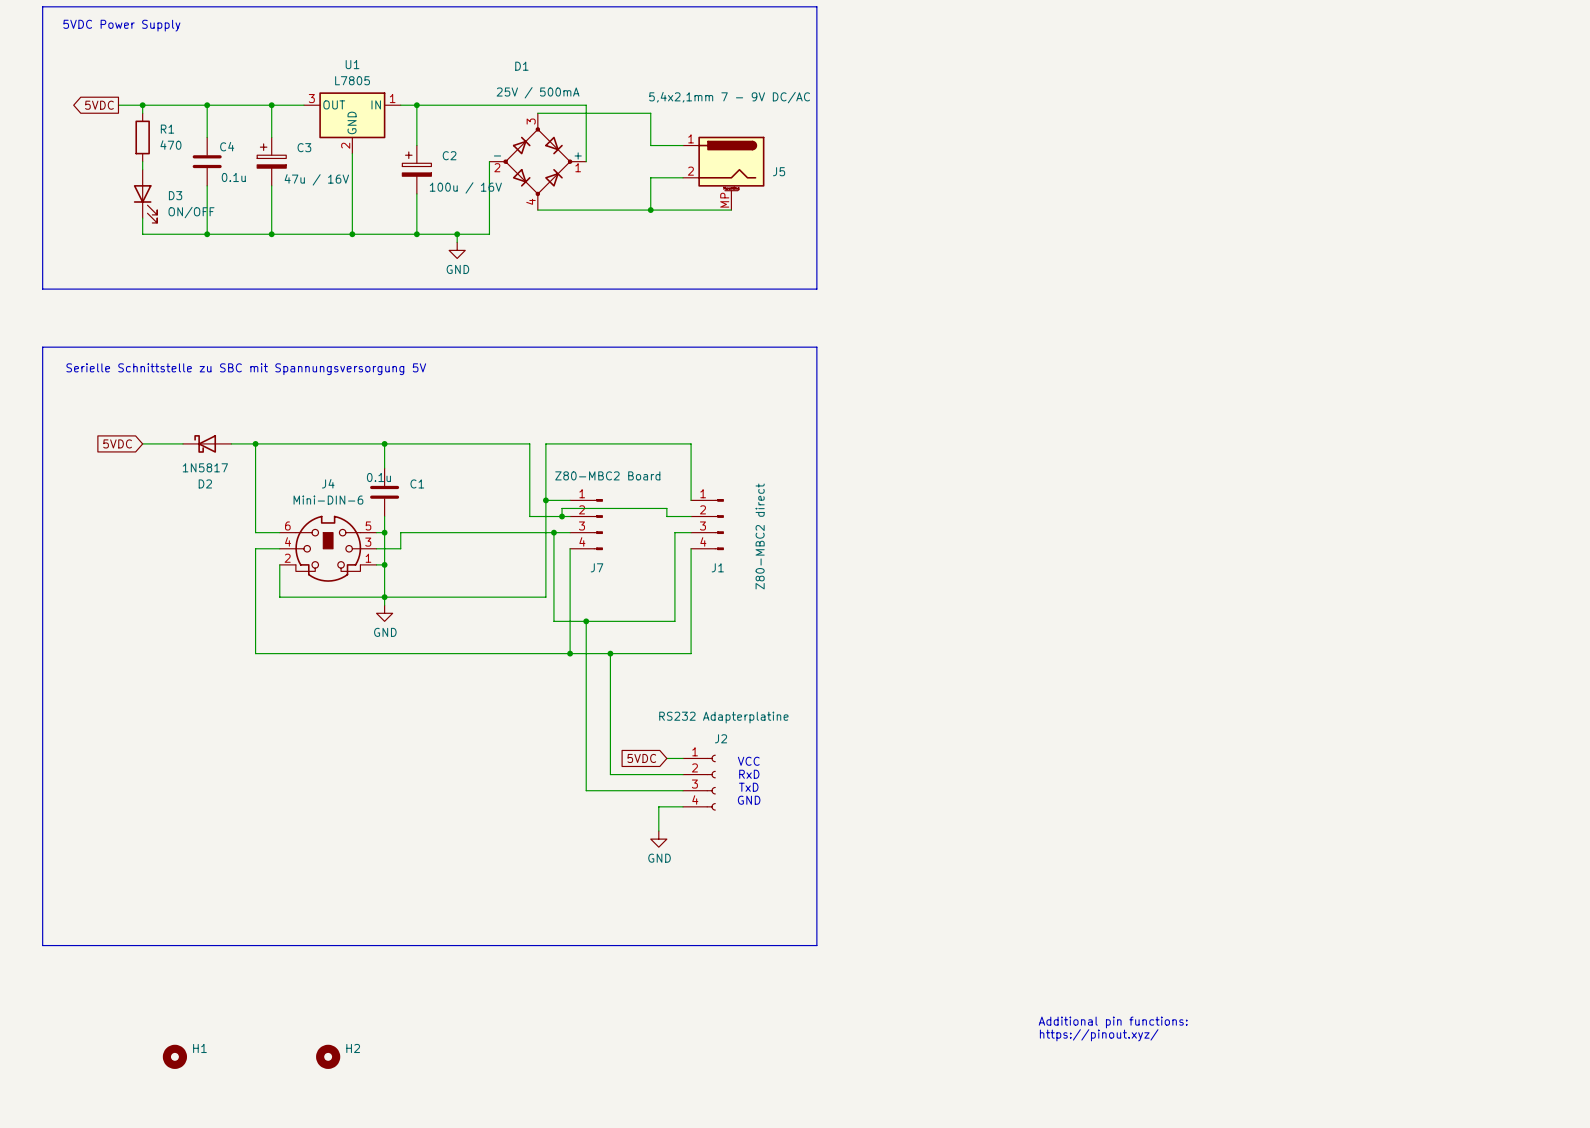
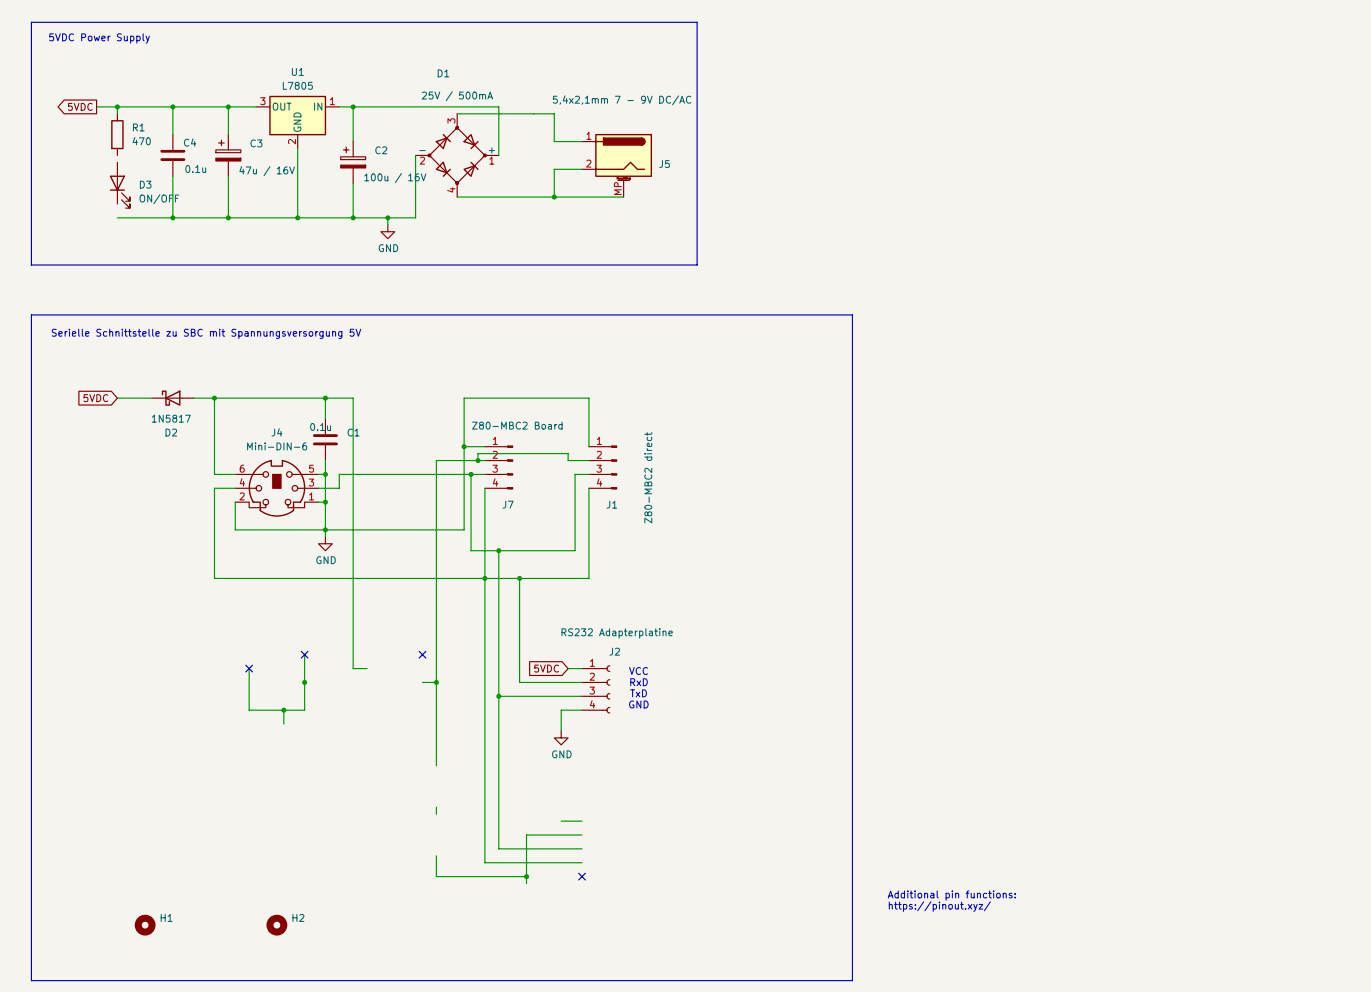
wire: (142, 161) (142, 169) -> none
wire: (142, 218) (142, 234) -> none
line: (816, 347) (816, 945) (42, 945) -> (697, 314) (852, 314) (852, 980) (31, 980) (31, 829)
wire: (416, 443) (529, 443) (529, 516) -> (353, 398) (353, 668) (367, 668)
wire: none -> (450, 460) (436, 460) (436, 765)
wire: none -> (484, 578) (484, 862) (582, 862)
wire: none -> (304, 654) (304, 710) (249, 710) (249, 668)
no-connect mark: none -> (304, 654)
no-connect mark: none -> (422, 654)
no-connect mark: none -> (249, 668)
junction: none -> (304, 682)
wire: none -> (422, 682) (436, 682)
junction: none -> (436, 682)
wire: none -> (498, 696) (498, 848) (582, 848)
junction: none -> (498, 696)
wire: none -> (283, 710) (283, 724)
junction: none -> (283, 710)
wire: none -> (436, 807) (436, 814)
wire: none -> (561, 821) (582, 821)
wire: none -> (582, 835) (526, 835) (526, 883)
wire: none -> (436, 855) (436, 876) (526, 876)
junction: none -> (526, 876)
no-connect mark: none -> (582, 876)

